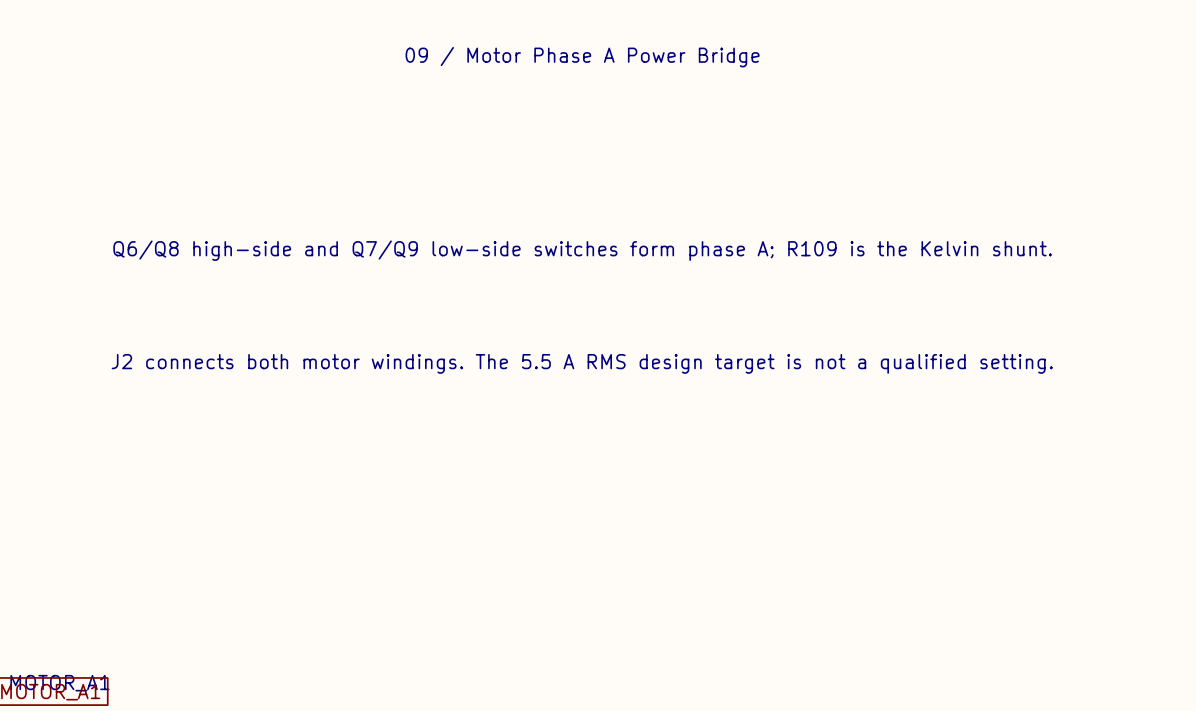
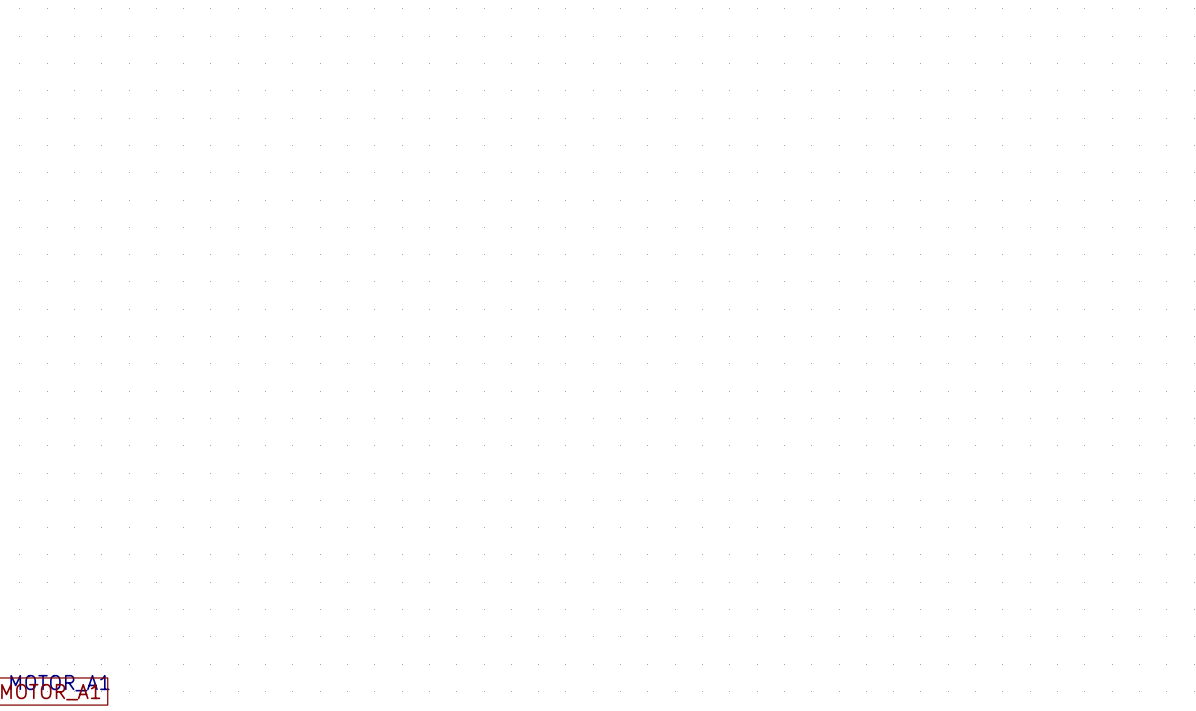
text: 09 / Motor Phase A Power Bridge (582, 57) -> none
text: Q6/Q8 high-side and Q7/Q9 low-side switches form phase A; R109 is the Kelvin shunt. (582, 250) -> none
text: J2 connects both motor windings. The 5.5 A RMS design target is not a qualified setting. (582, 363) -> none

